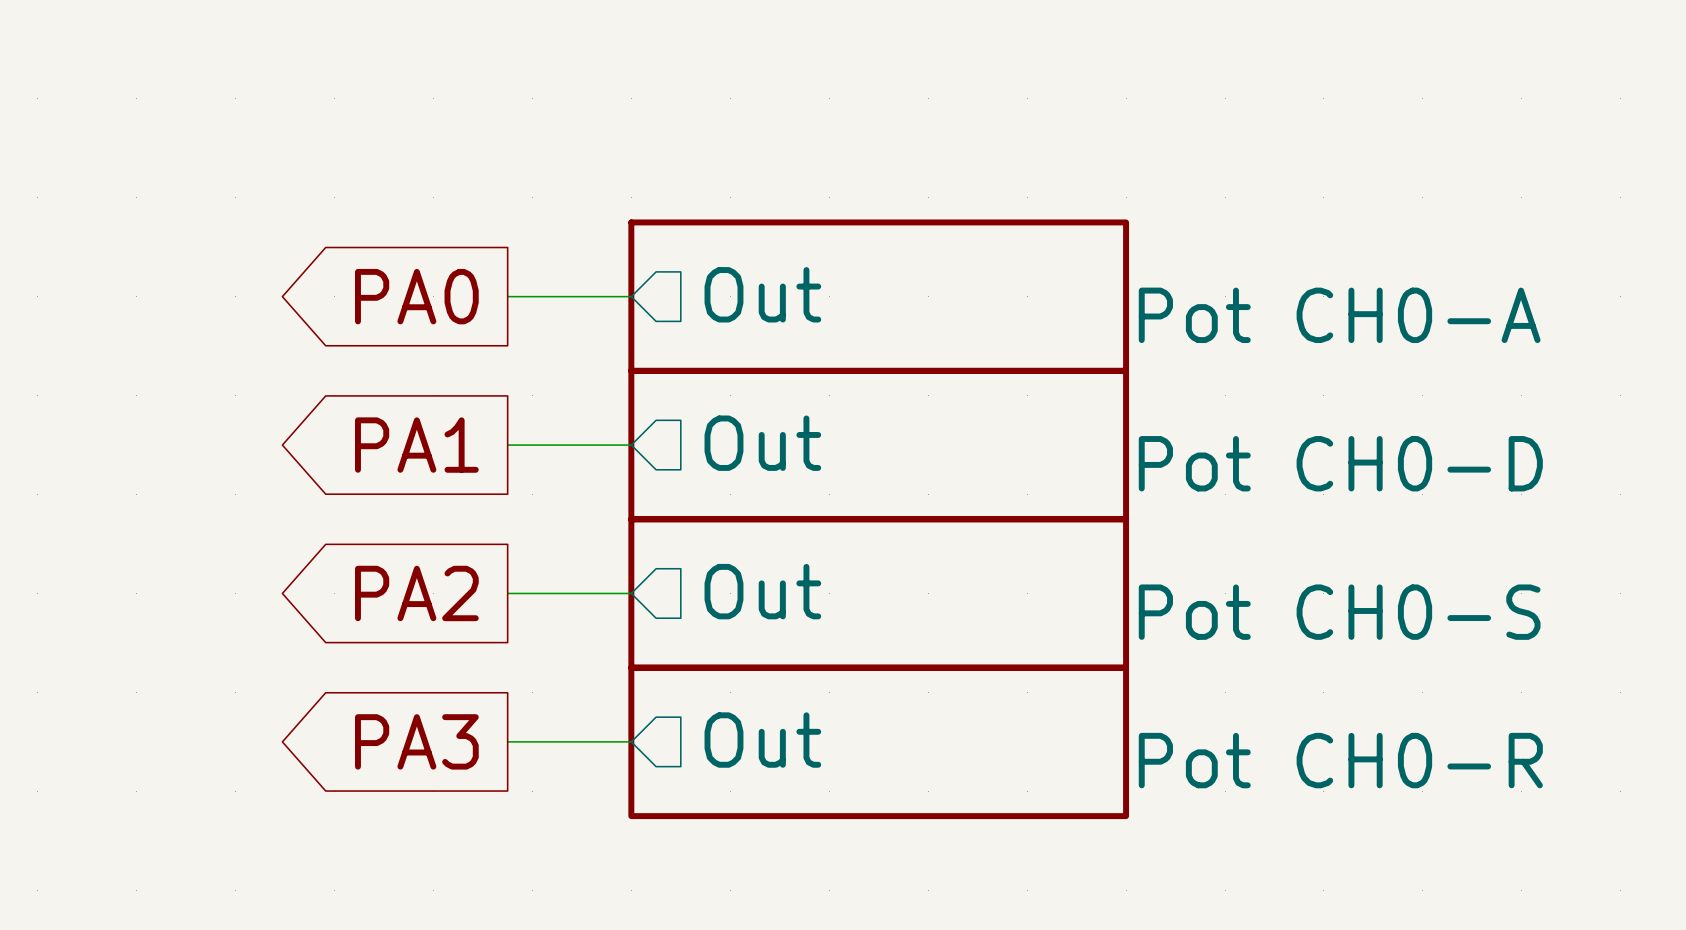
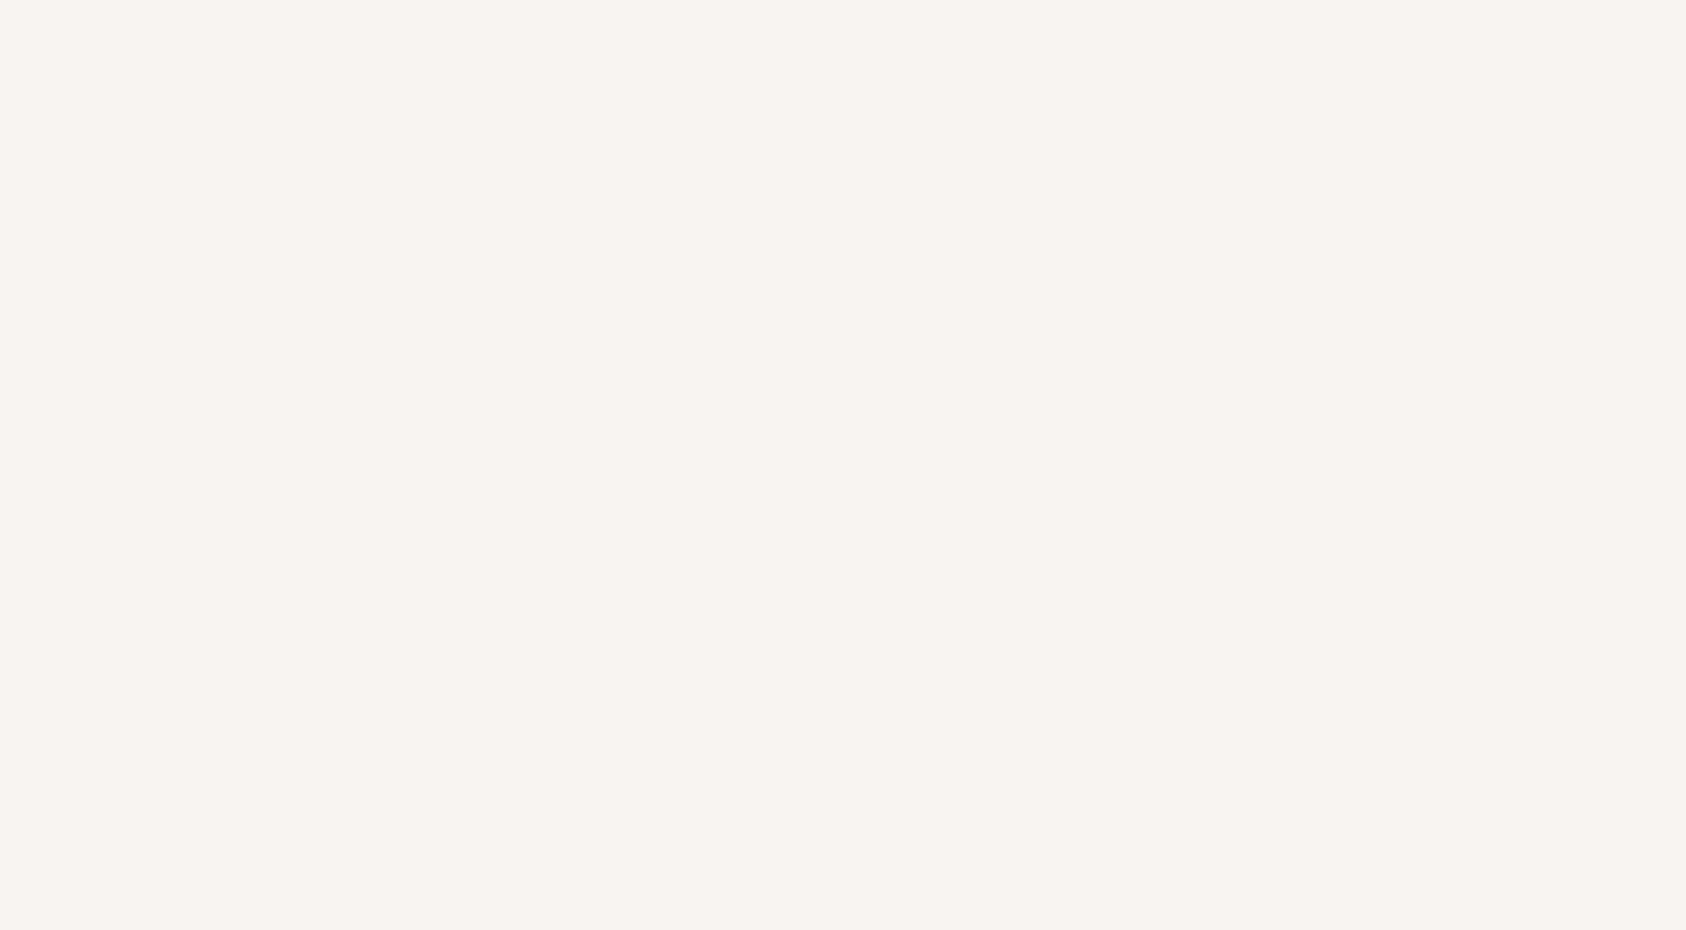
sheet pin: Out (762, 294) -> none
global label: PA0 (416, 296) -> none
wire: (507, 296) (631, 296) -> none
sheet Pot CH0-A: (878, 296) -> none
sheet pin: Out (762, 443) -> none
global label: PA1 (416, 445) -> none
wire: (507, 445) (631, 445) -> none
sheet Pot CH0-D: (878, 445) -> none
sheet pin: Out (762, 591) -> none
global label: PA2 (416, 593) -> none
wire: (507, 593) (631, 593) -> none
sheet Pot CH0-S: (878, 593) -> none
sheet pin: Out (762, 740) -> none
global label: PA3 (416, 741) -> none
wire: (507, 741) (631, 741) -> none
sheet Pot CH0-R: (878, 741) -> none

